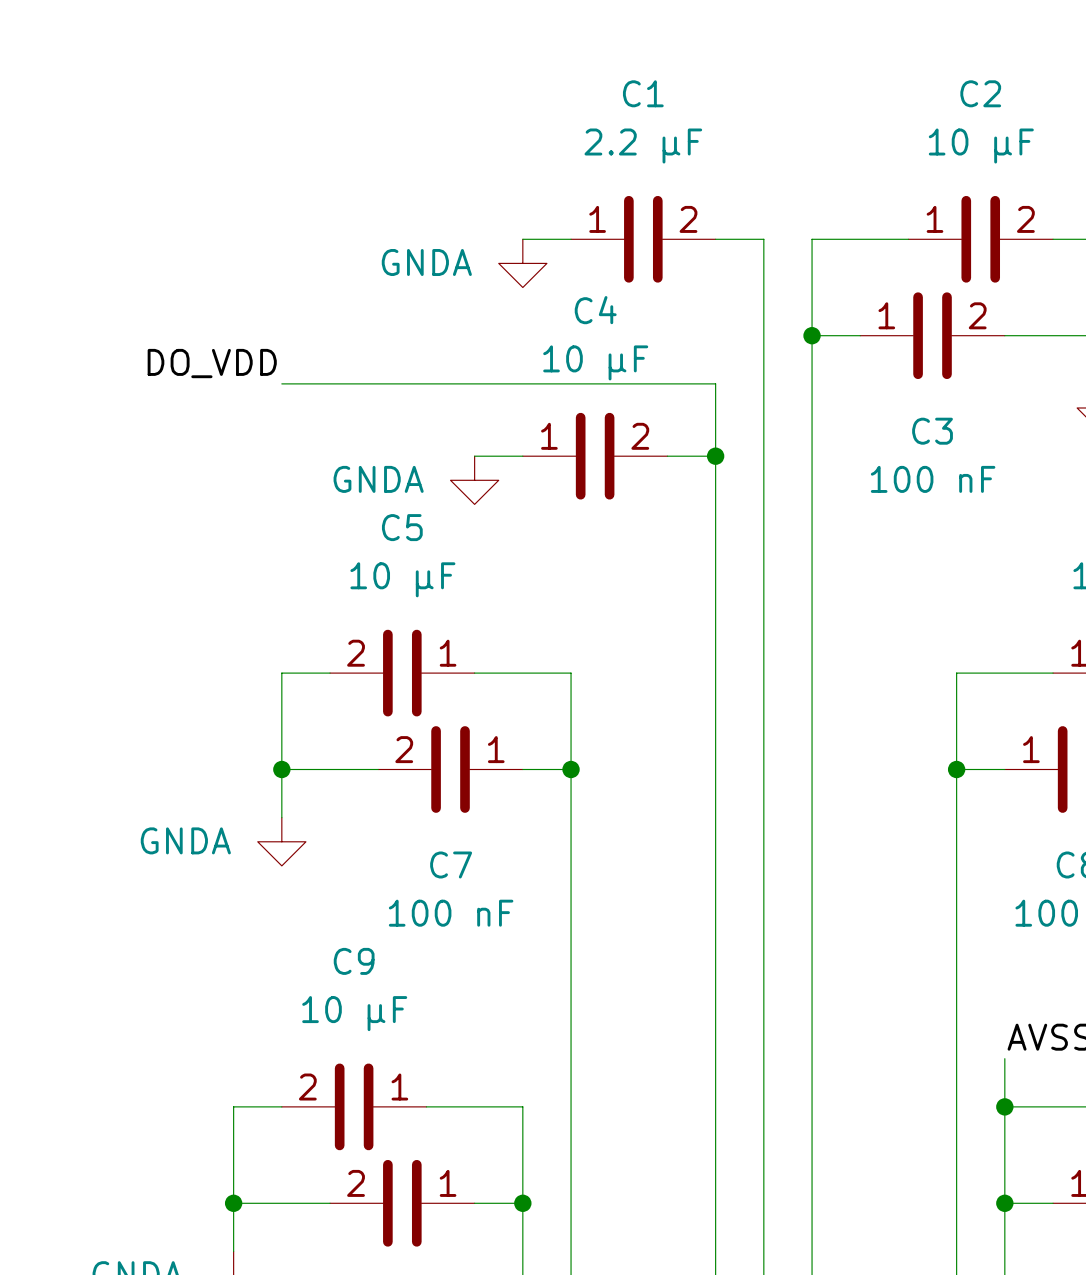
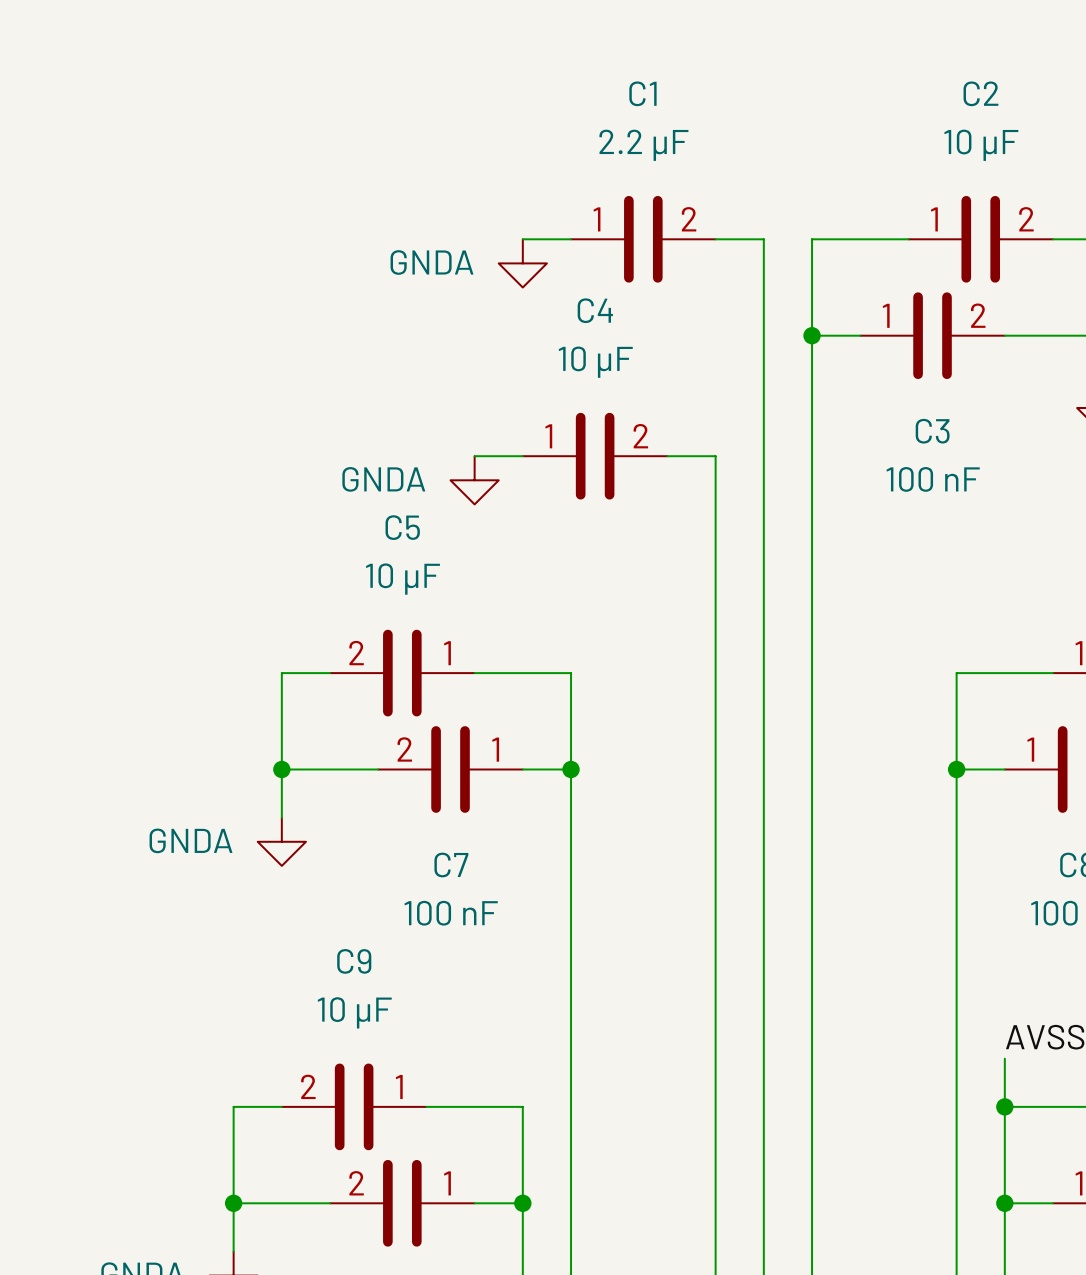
label: DO_VDD (212, 363) -> none
wire: (281, 383) (715, 383) (715, 456) -> none
junction: (715, 456) -> none

